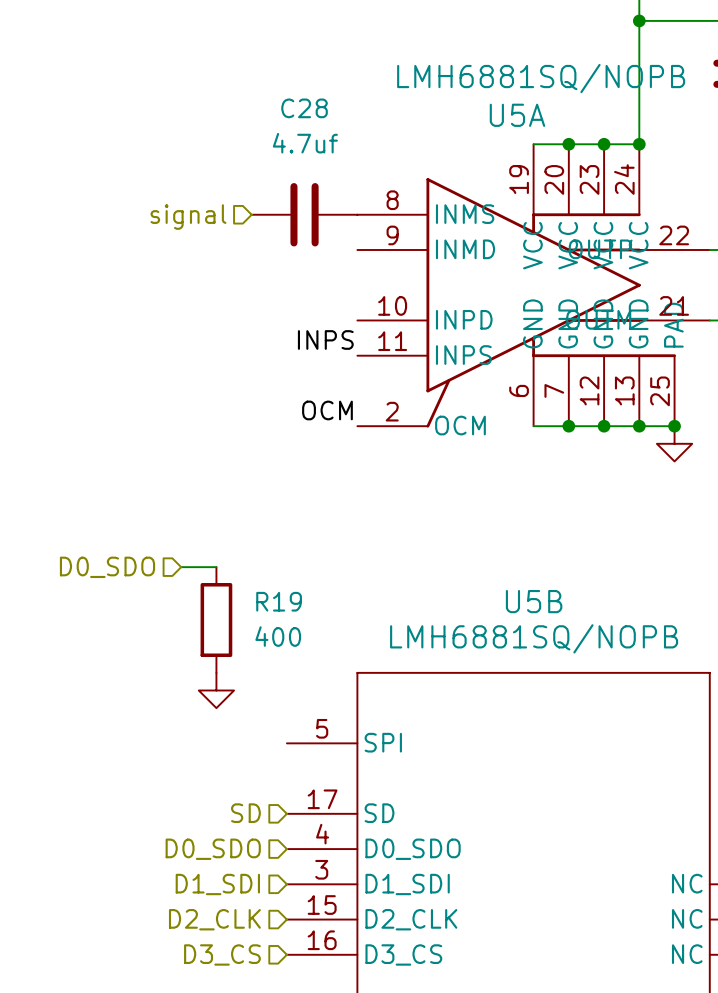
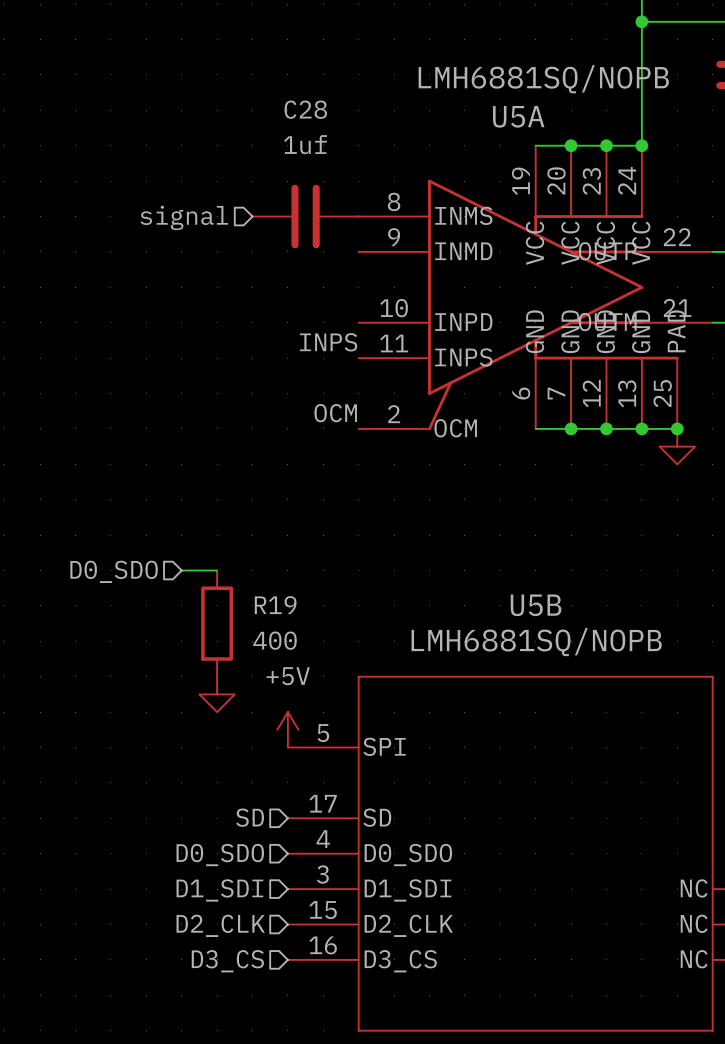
C28 value: 4.7uf (305, 143) -> 1uf (305, 144)
power symbol: none -> +5V (287, 729)

